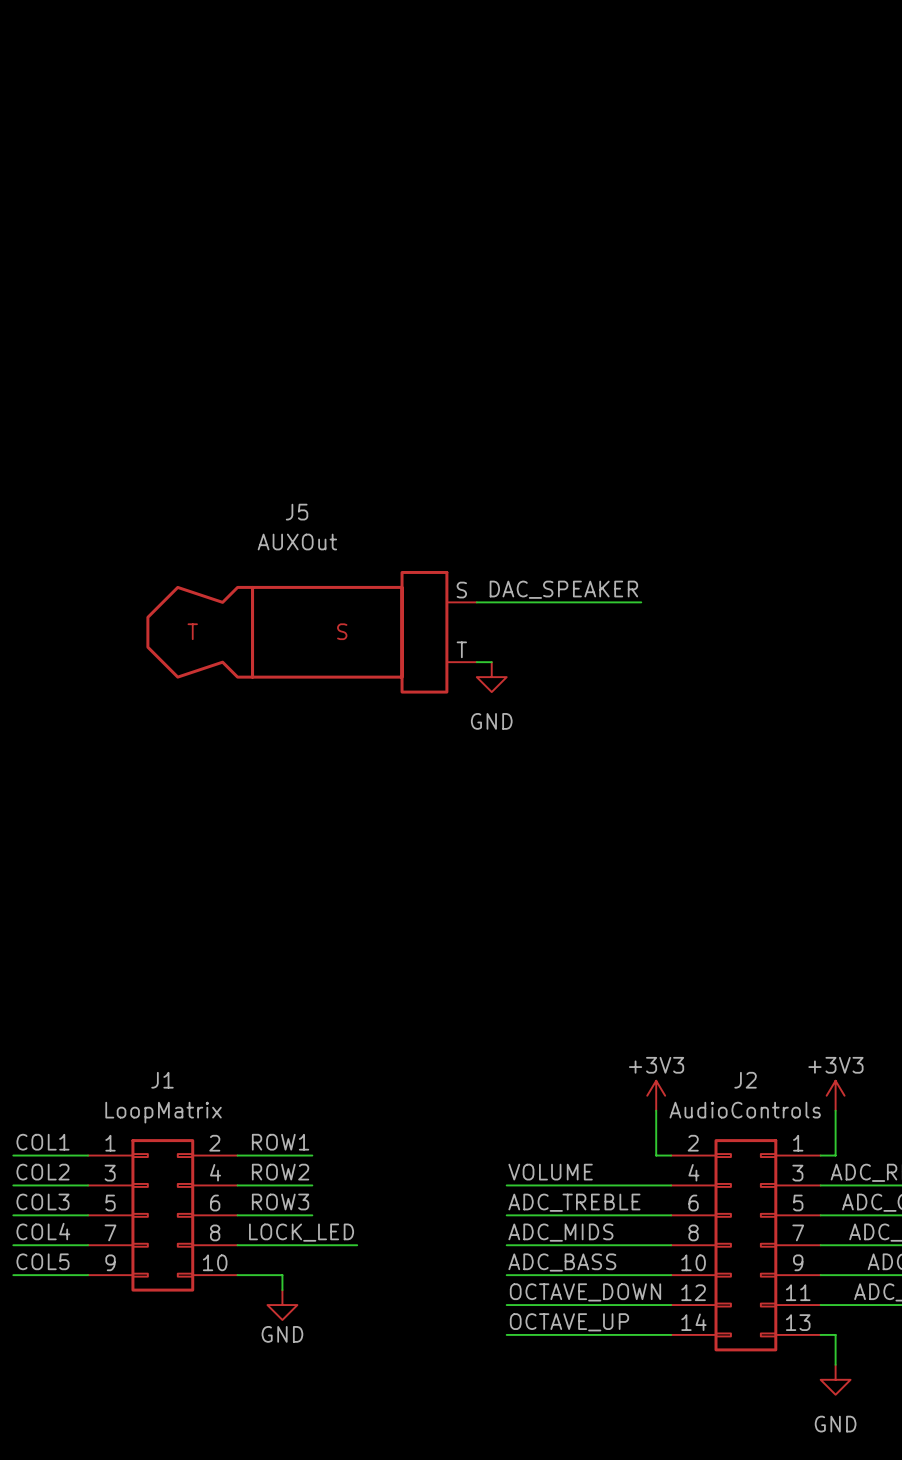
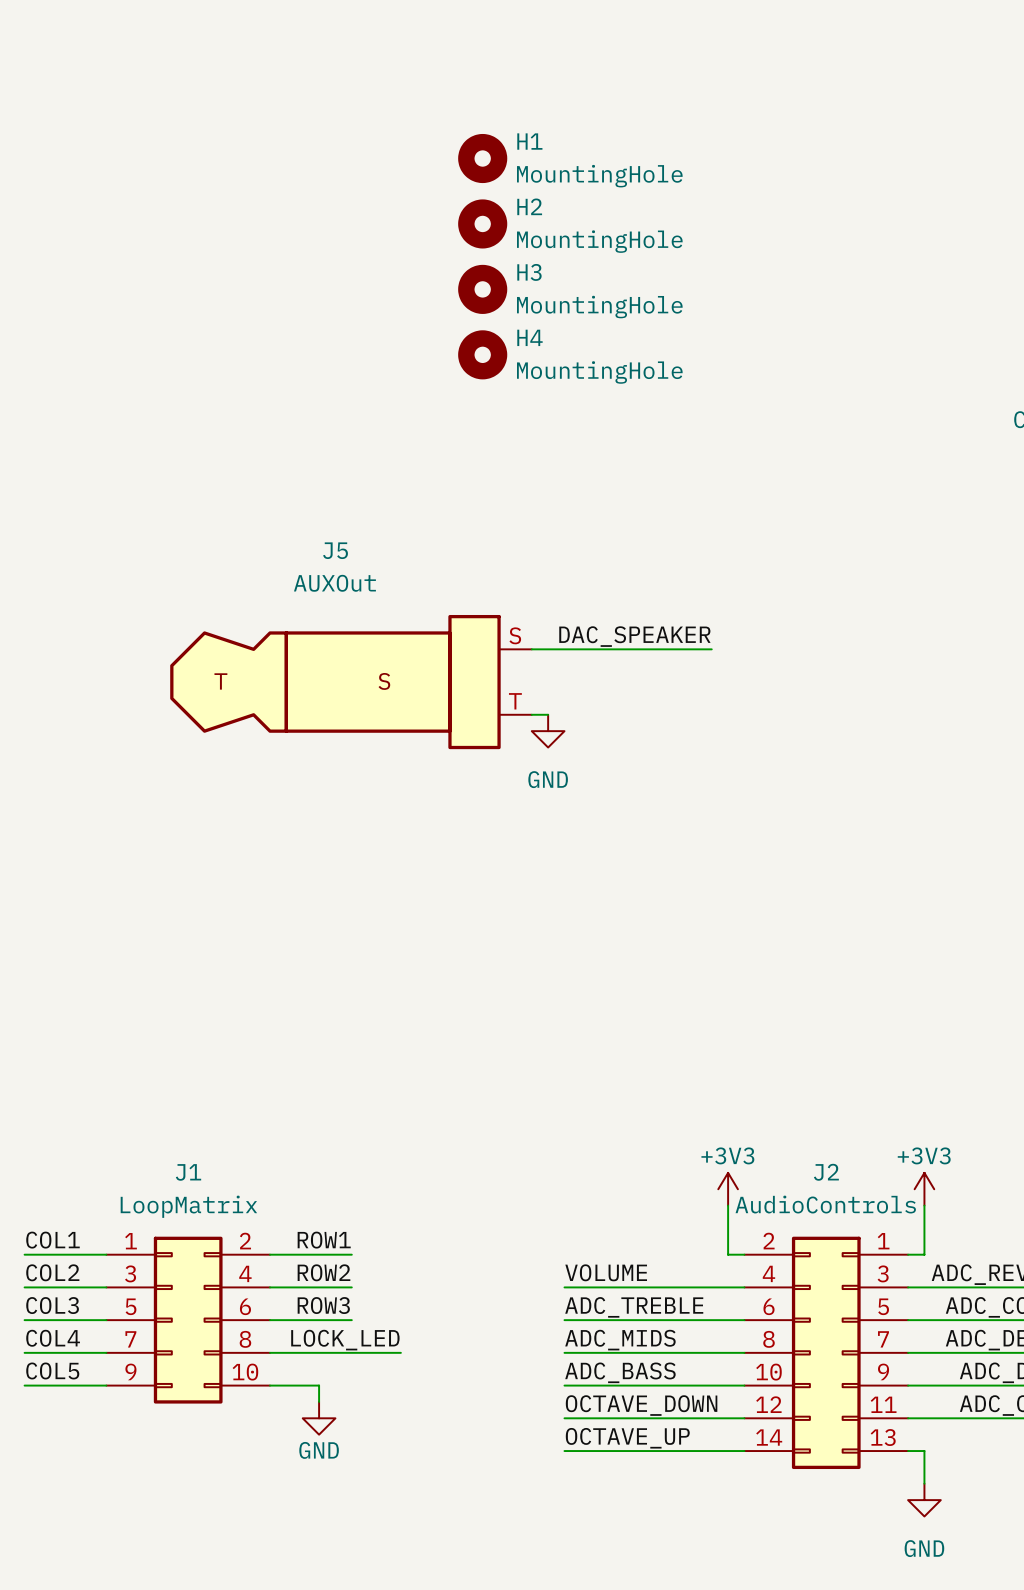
H1: none -> MountingHole (482, 158)
H2: none -> MountingHole (482, 223)
H3: none -> MountingHole (482, 289)
H4: none -> MountingHole (482, 354)

